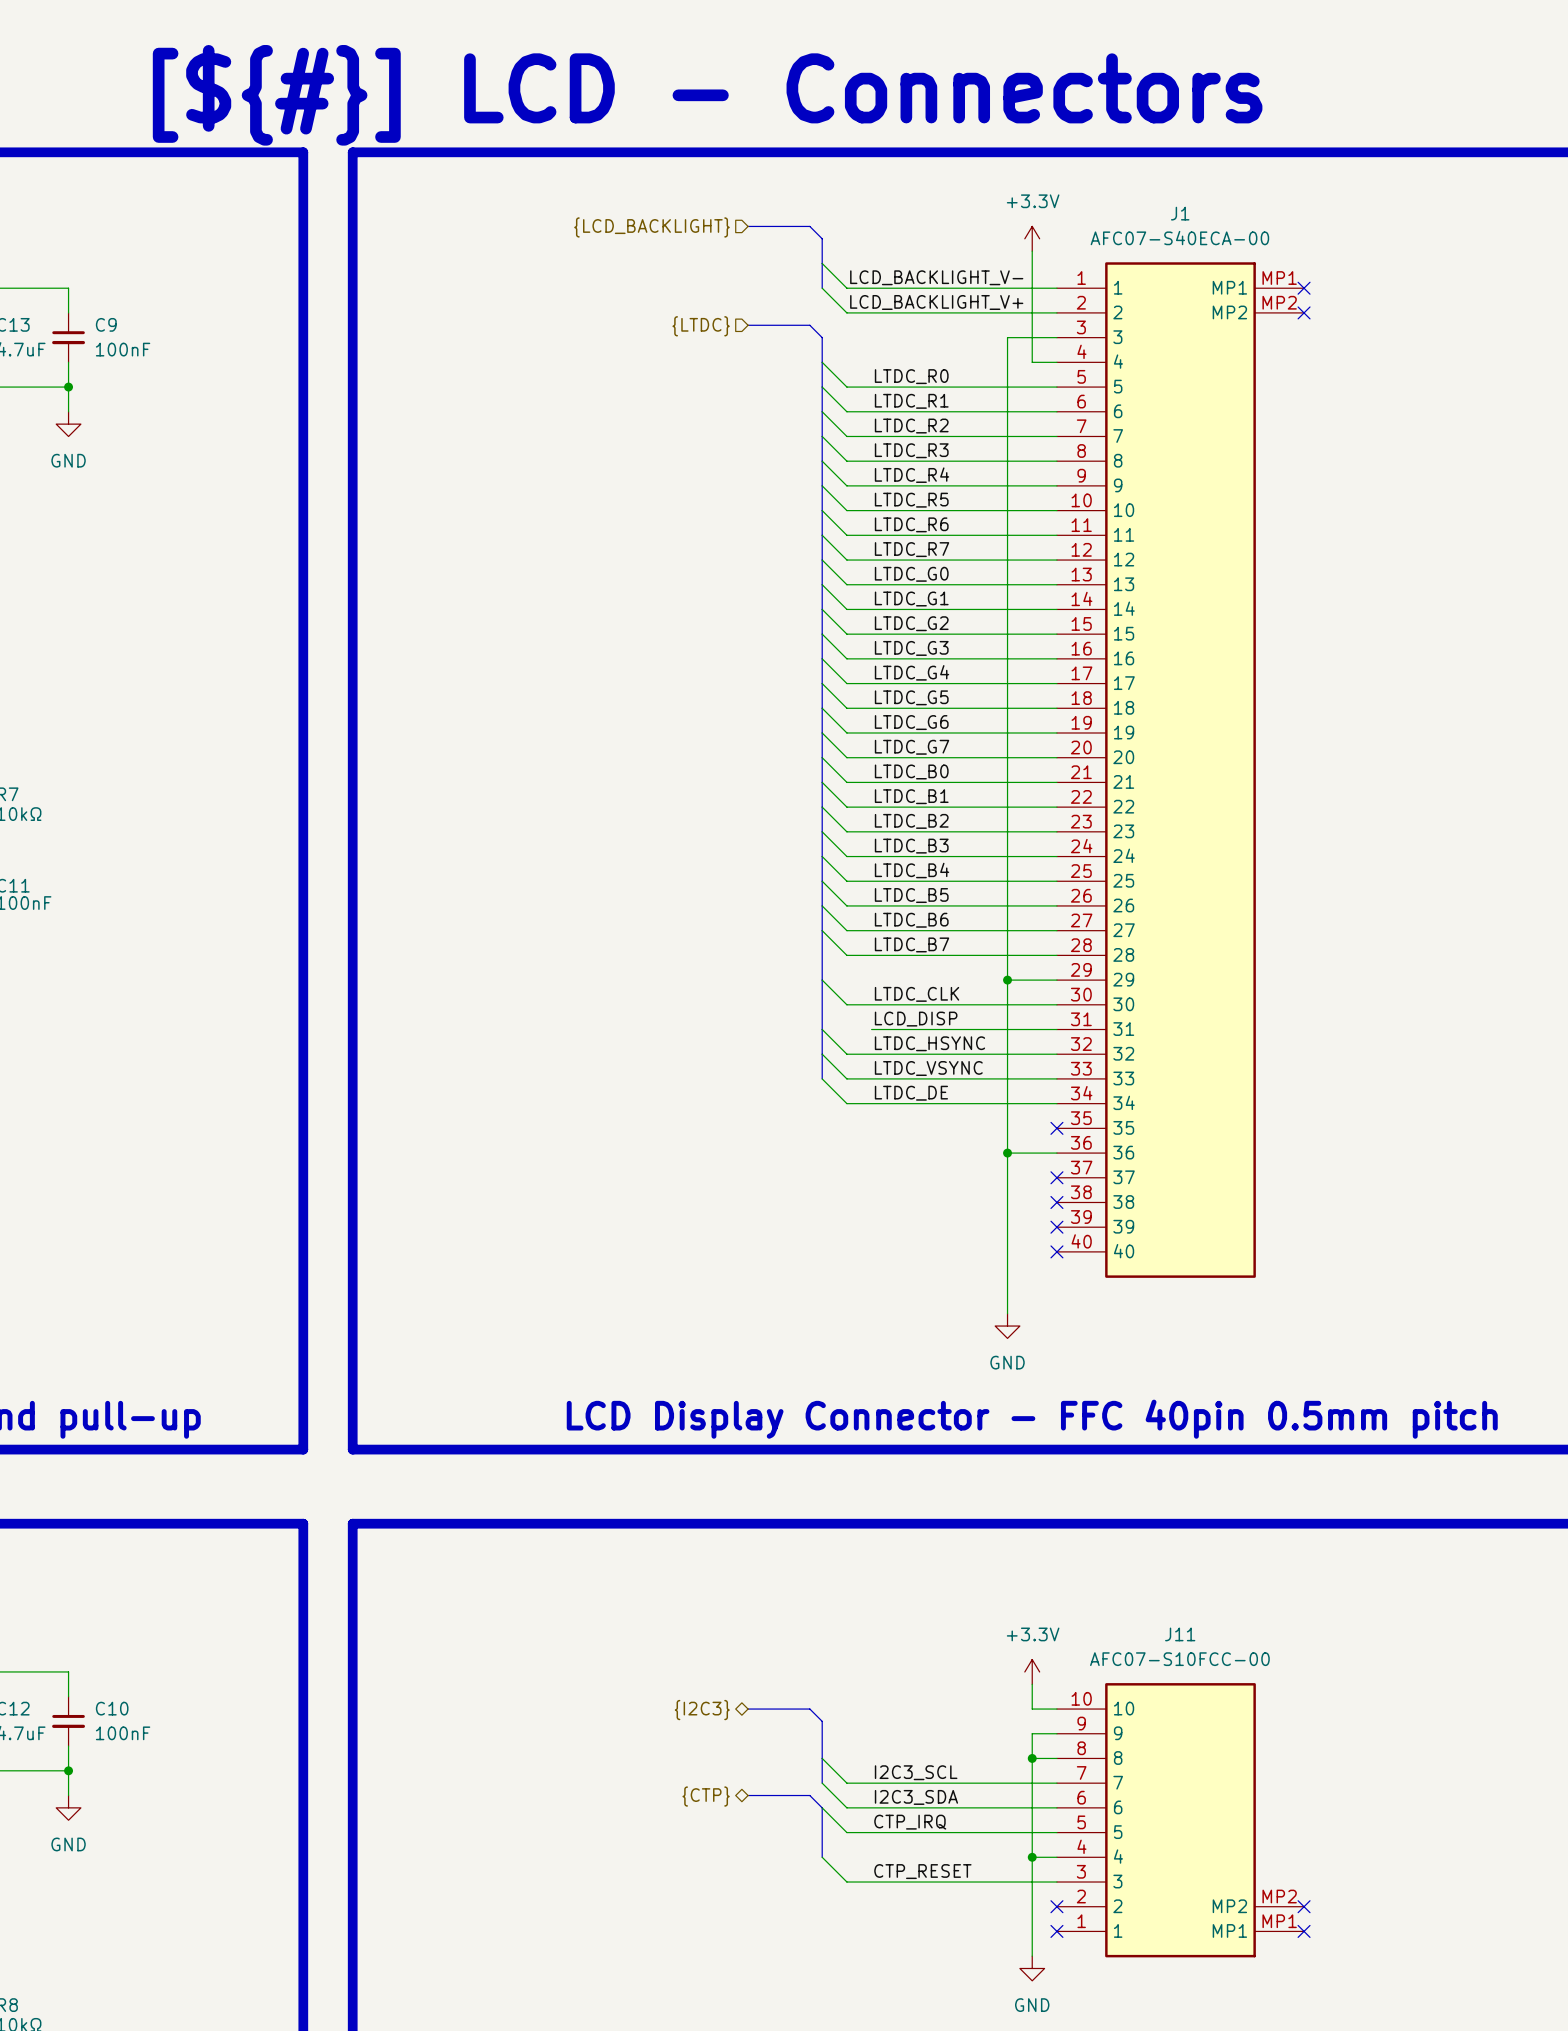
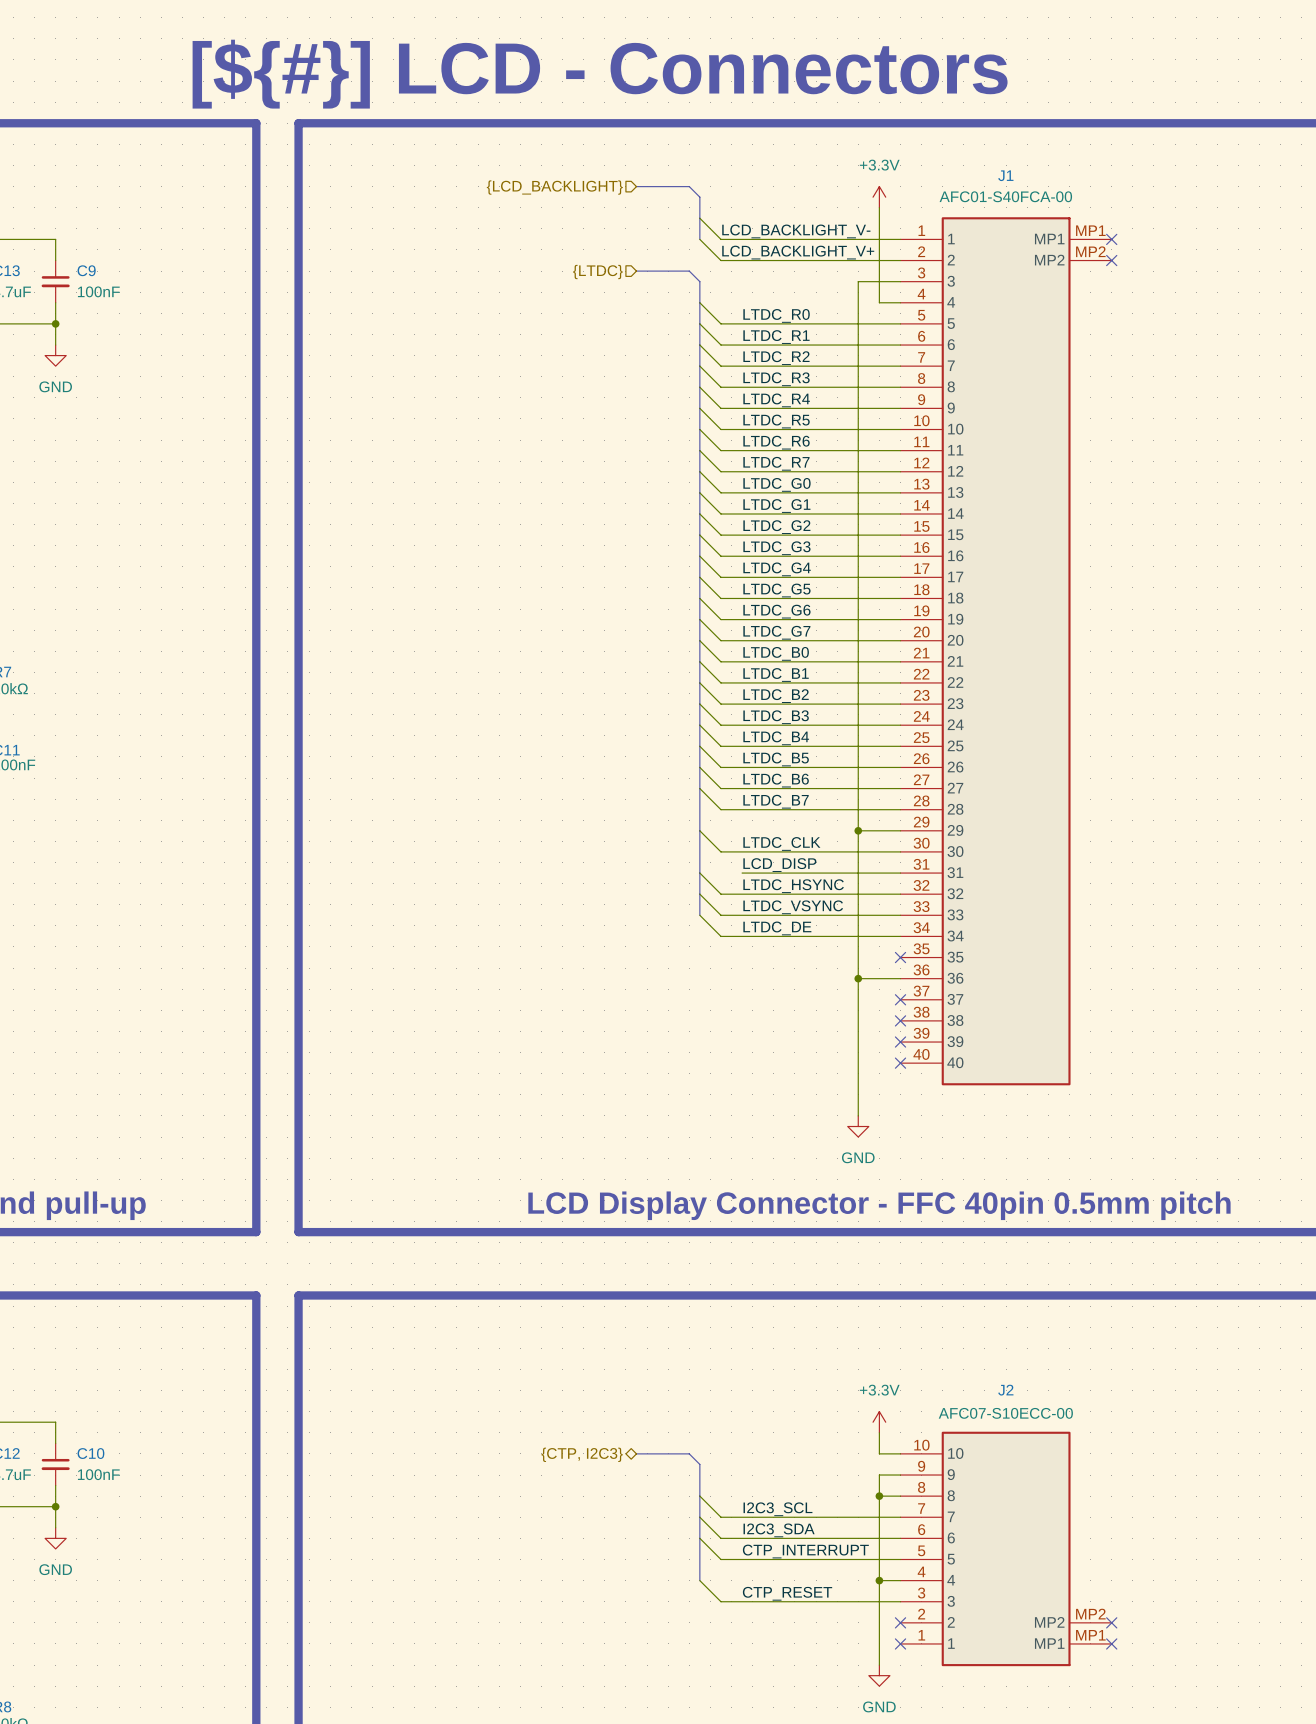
J1 value: AFC07-S40ECA-00 (1179, 238) -> AFC01-S40FCA-00 (1005, 196)
J11 name: J11 (1180, 1634) -> J2 (1005, 1390)
J11 value: AFC07-S10FCC-00 (1179, 1659) -> AFC07-S10ECC-00 (1005, 1413)
hierarchical label: {I2C3} (702, 1710) -> {CTP, I2C3} (582, 1454)
bus: (748, 1795) (809, 1795) (822, 1807) -> (699, 1517) (699, 1538)
hierarchical label: {CTP} (706, 1796) -> none
label: CTP_IRQ (910, 1822) -> CTP_INTERRUPT (805, 1551)

